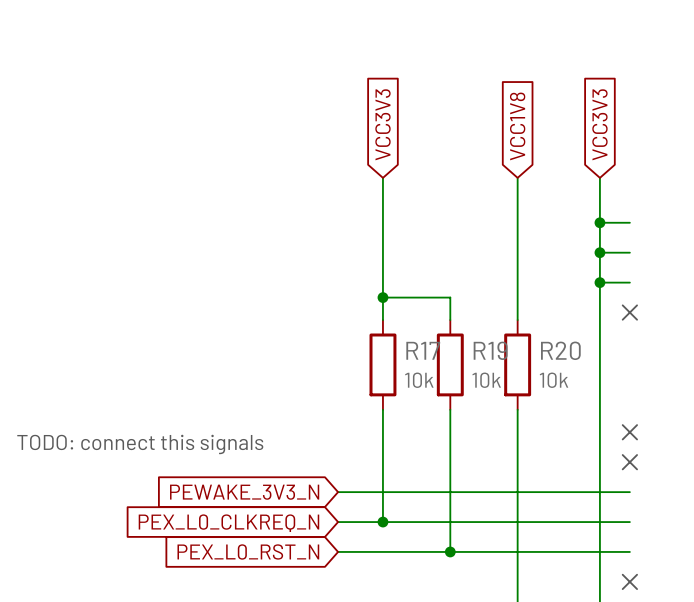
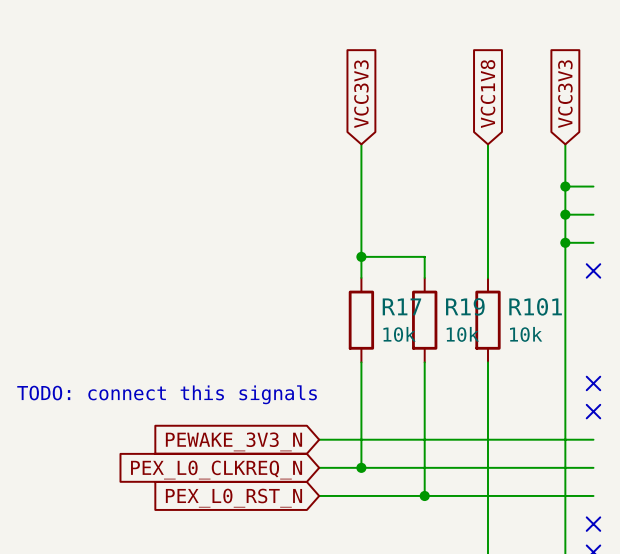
R20 name: R20 (560, 350) -> R101 (535, 306)

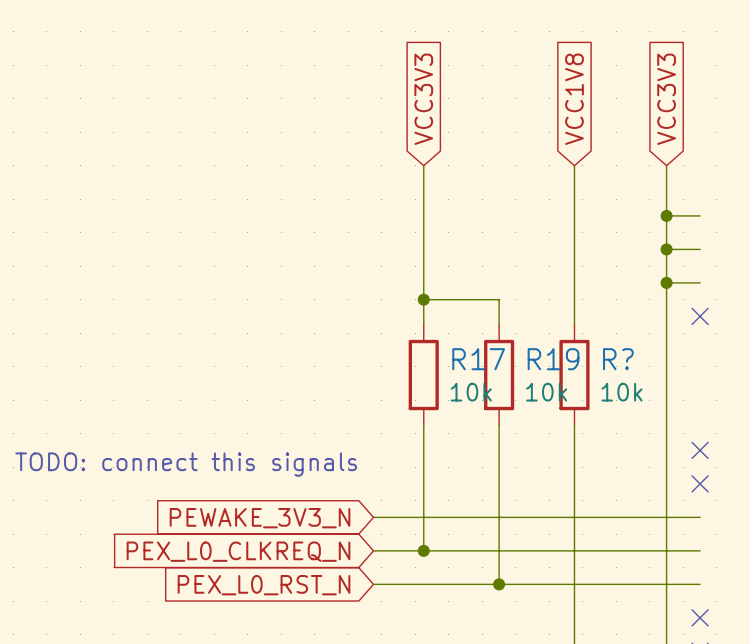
R101 name: R101 (535, 306) -> R? (618, 359)

